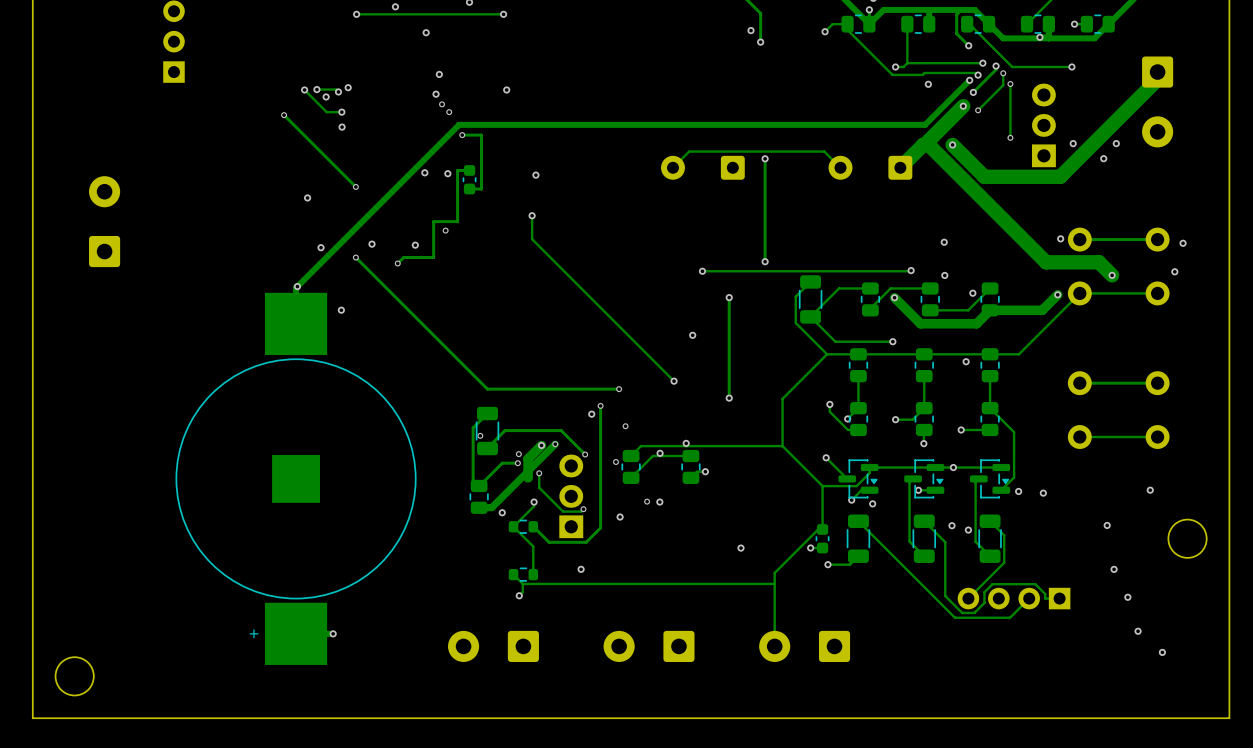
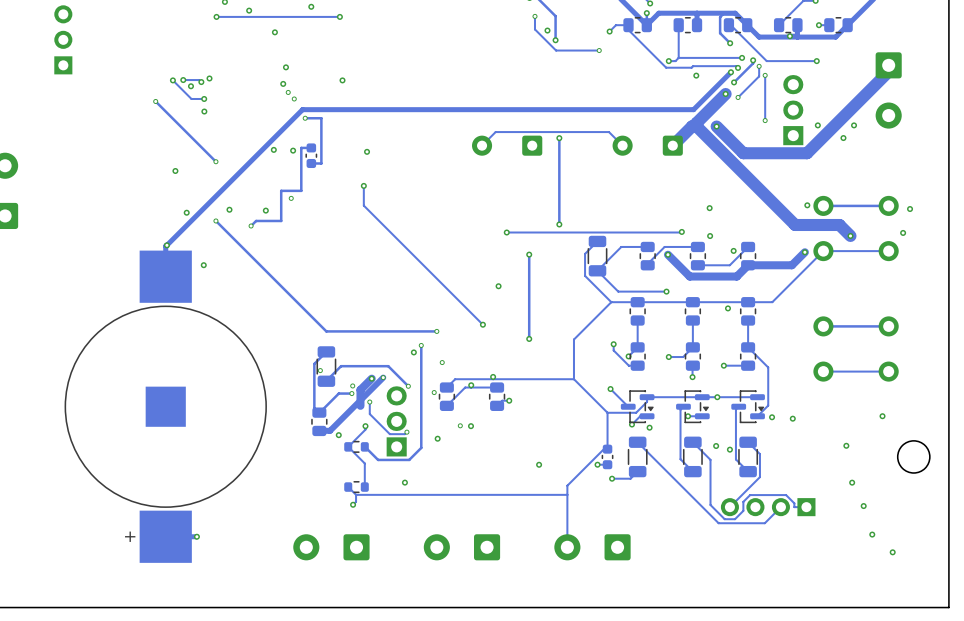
track: none -> (534, 16) (534, 29) (556, 50) (599, 50)
via: none -> (534, 16)
via: none -> (599, 50)

